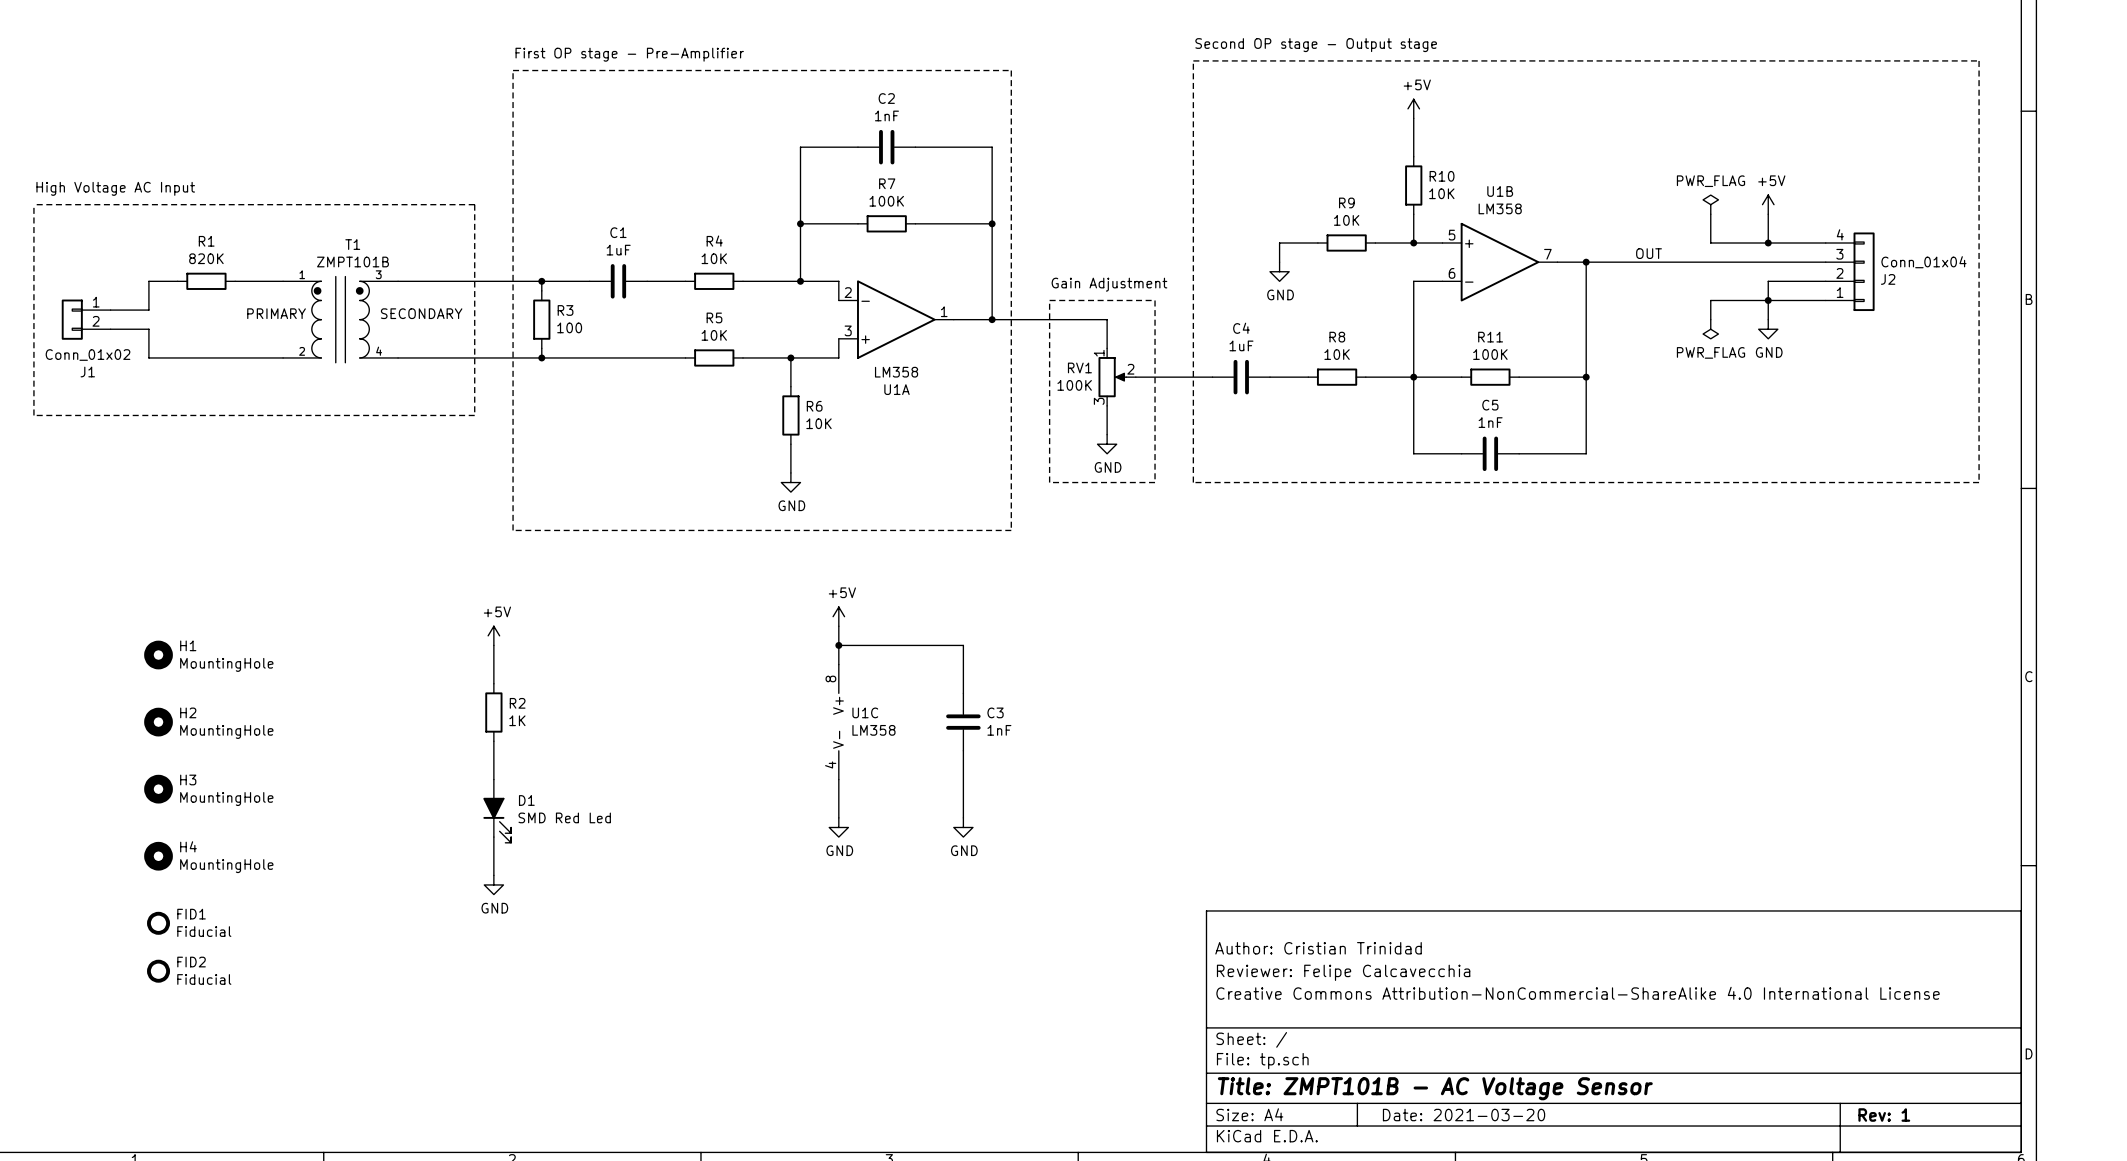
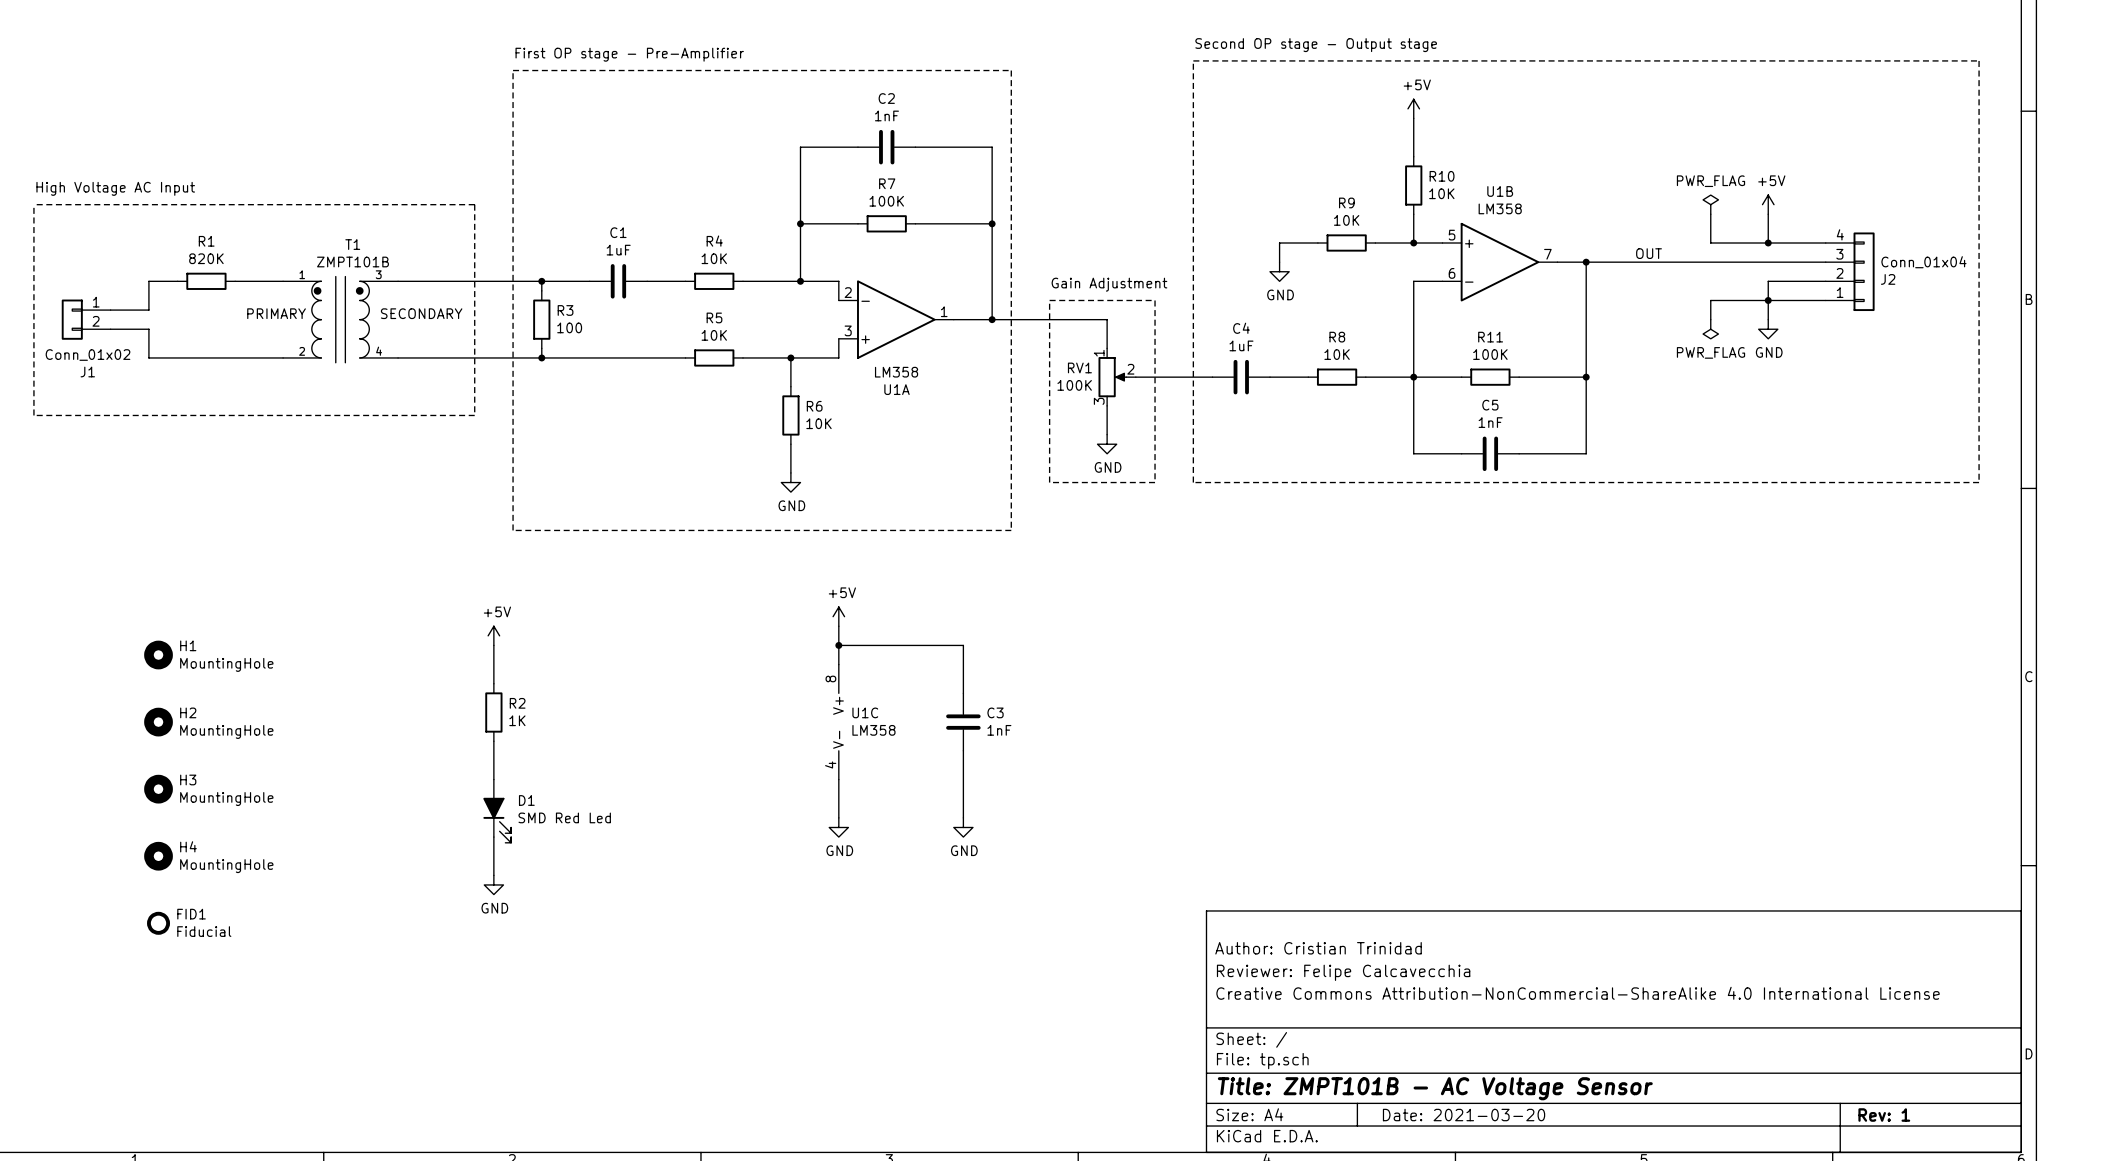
FID2: Fiducial (158, 971) -> none

